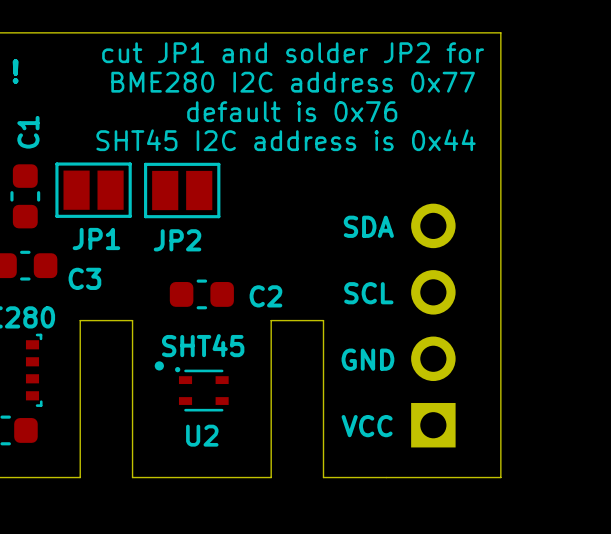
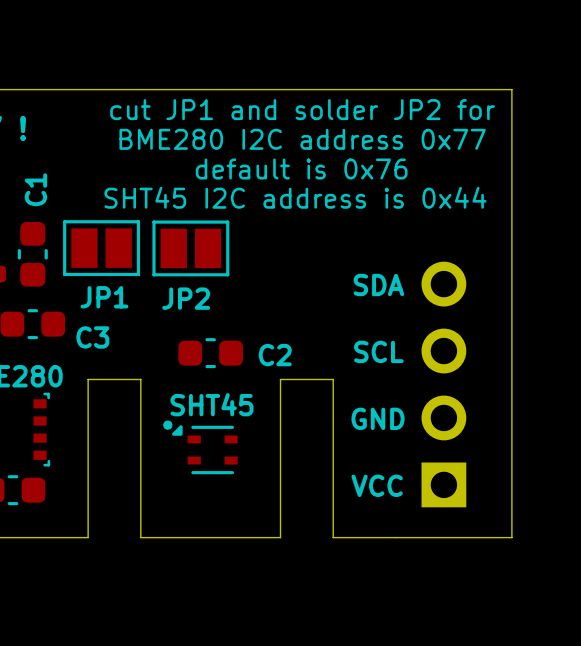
U2: (201, 389) -> none
part: none -> (204, 449)

